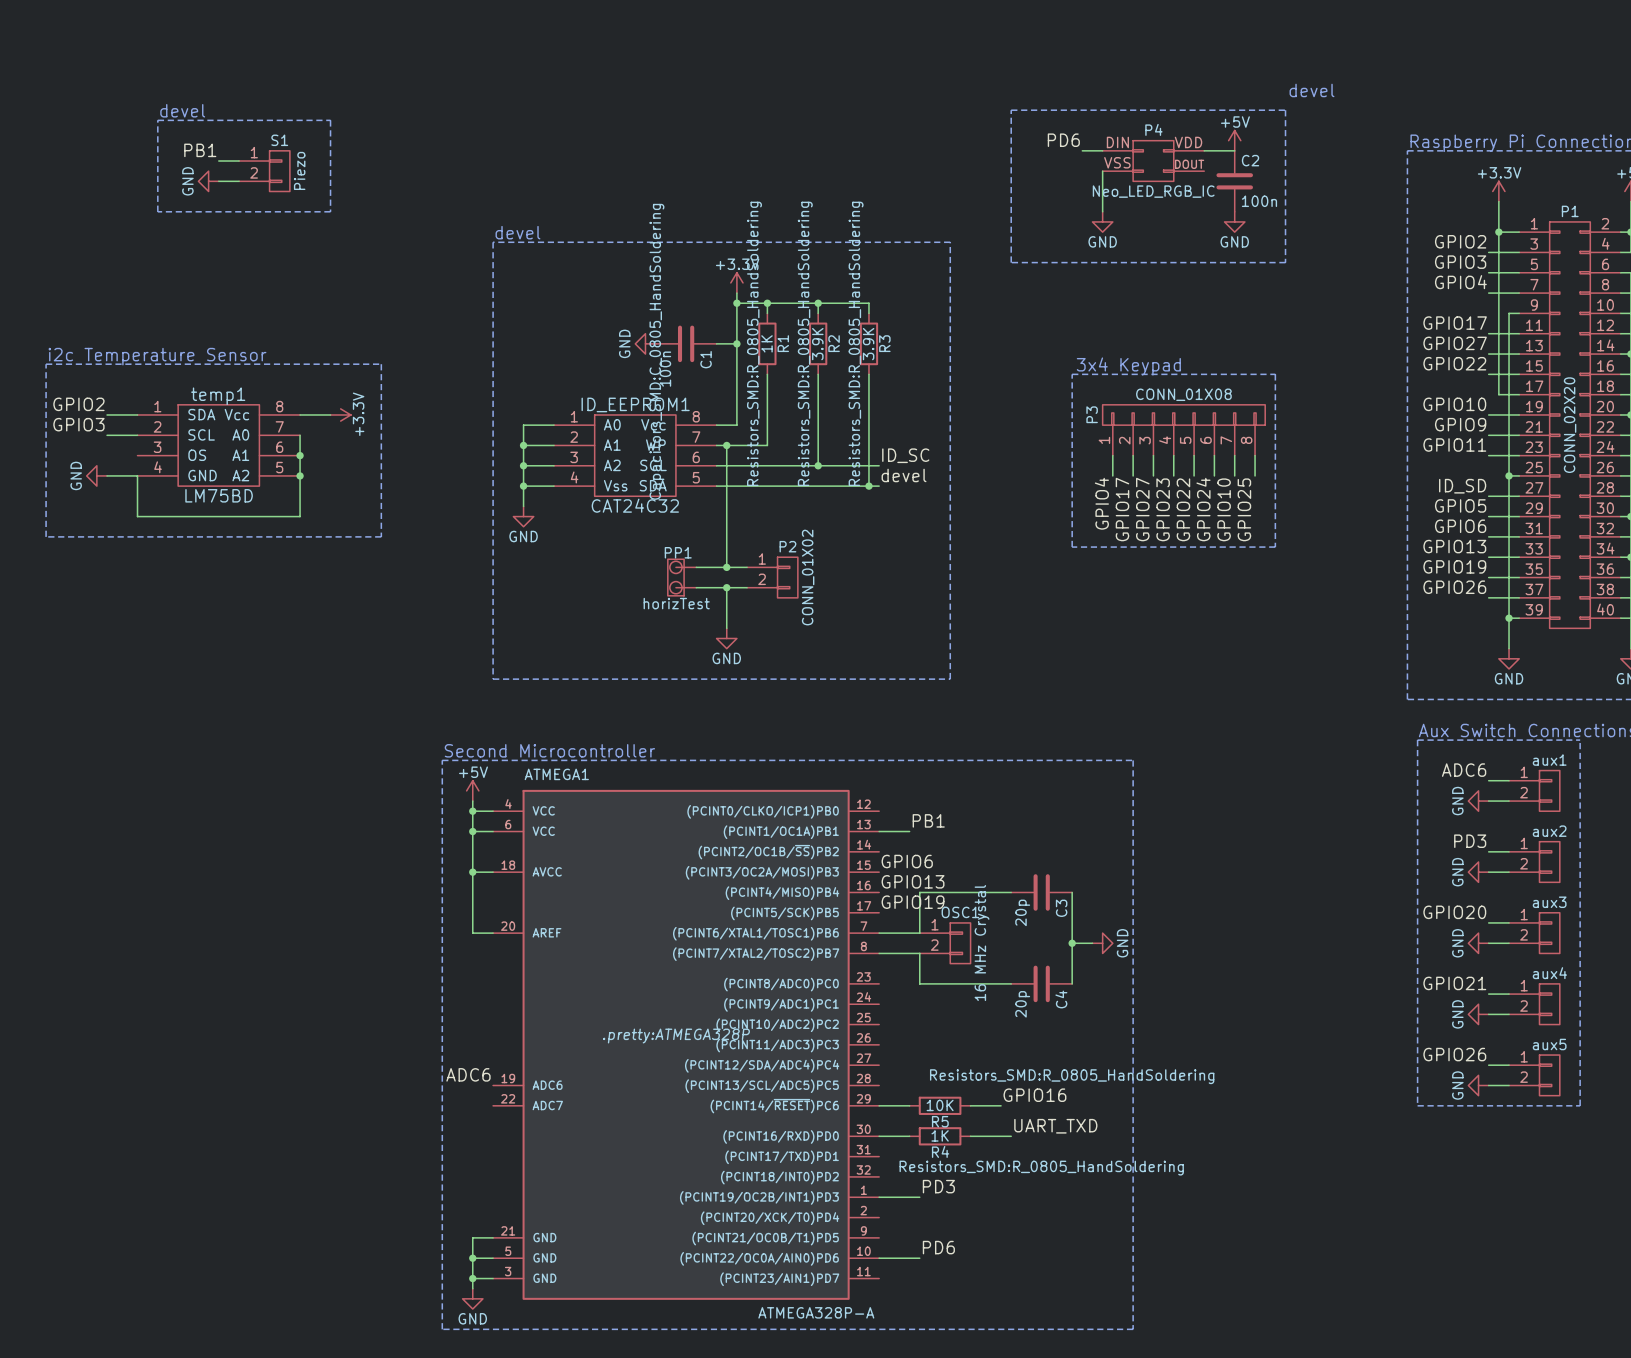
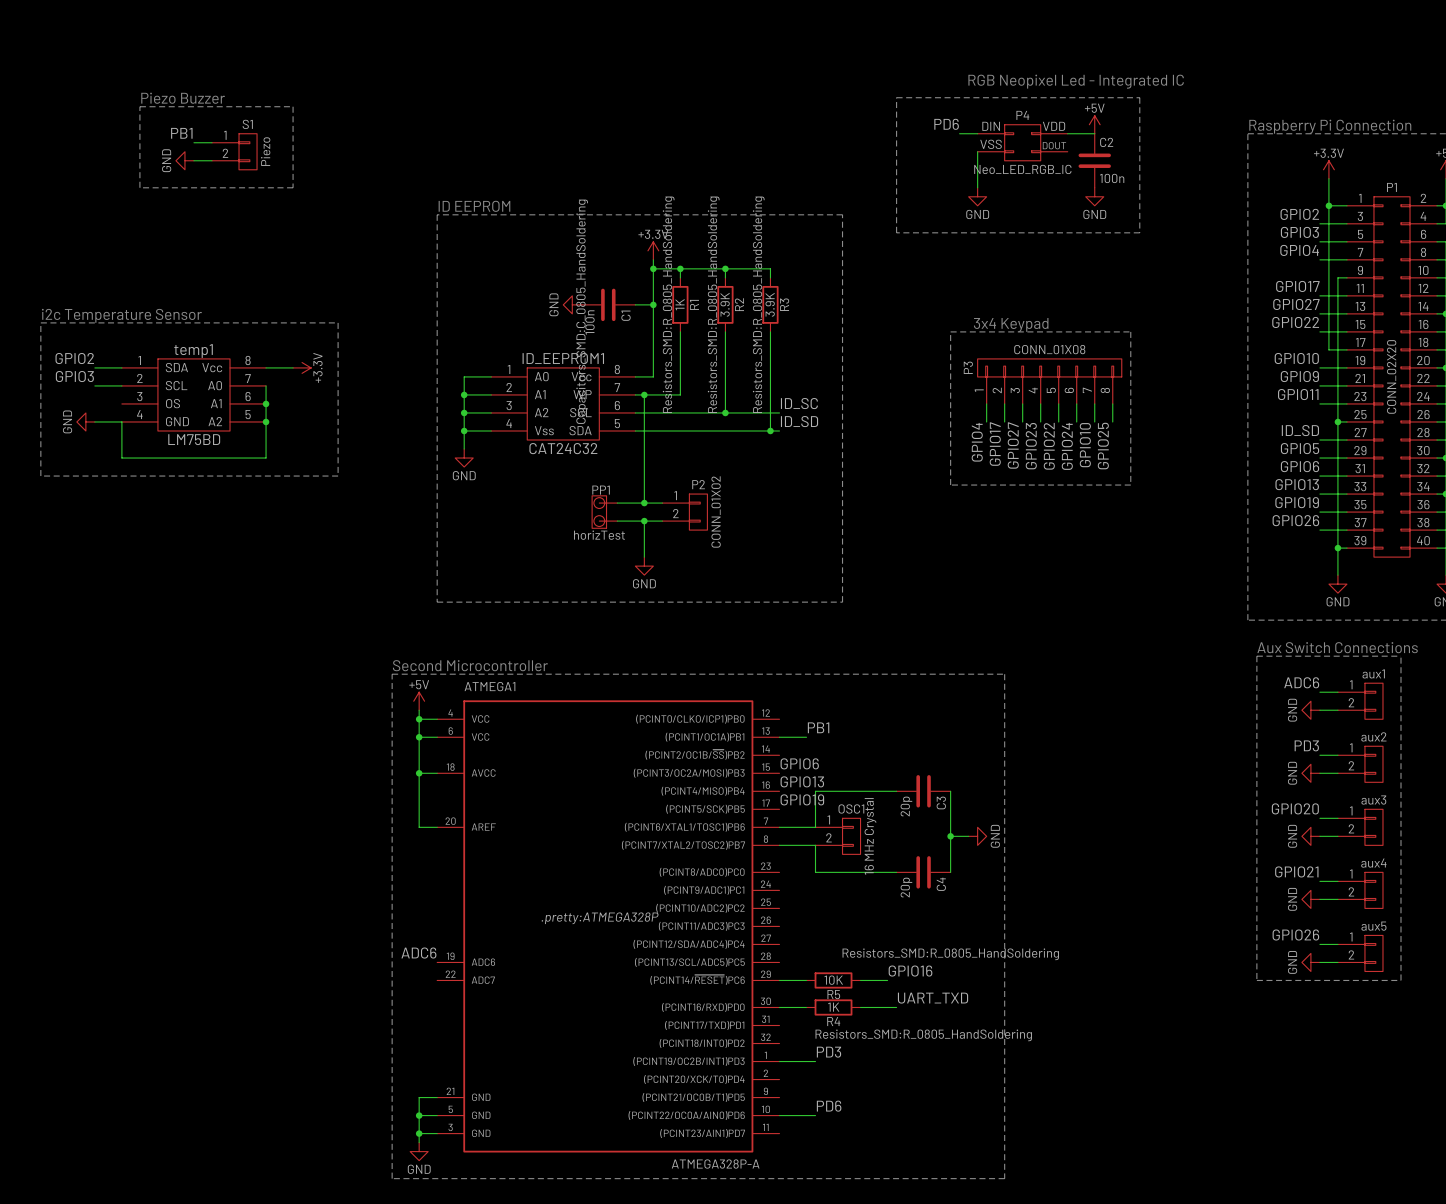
text: devel (1311, 90) -> RGB Neopixel Led - Integrated IC (1076, 81)
text: devel (182, 110) -> Piezo Buzzer (183, 98)
text: devel (517, 232) -> ID EEPROM (474, 206)
label: devel (904, 475) -> ID_SD (799, 421)

